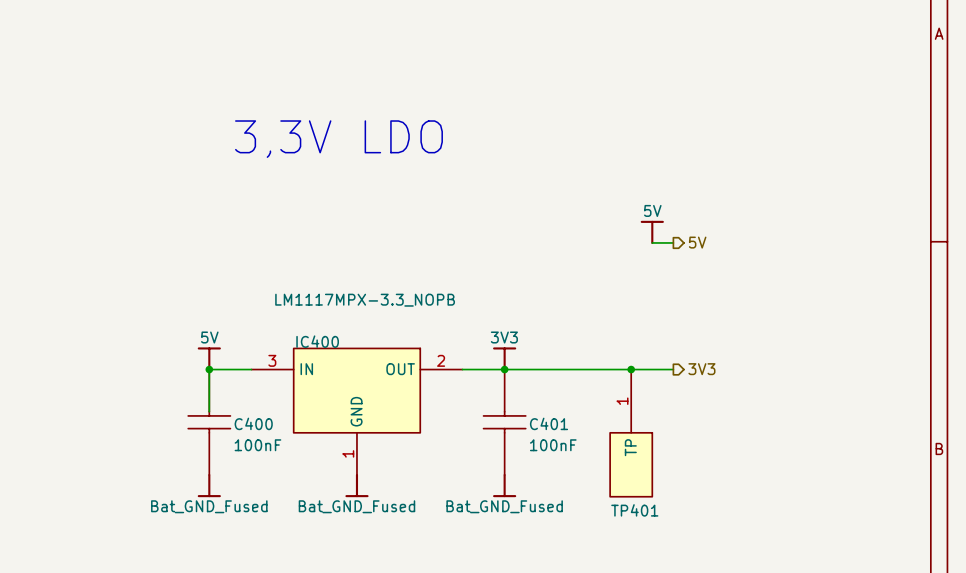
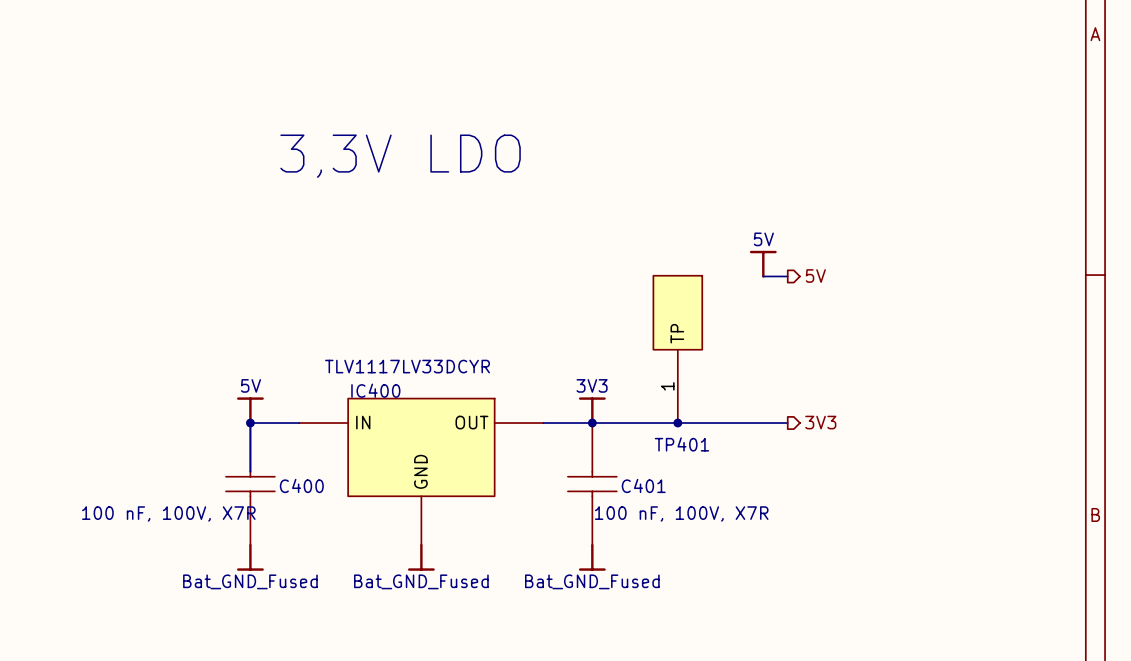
IC400 value: LM1117MPX-3.3_NOPB (365, 300) -> TLV1117LV33DCYR (407, 366)
IC400 pin number: 3 (272, 360) -> none
IC400 pin number: 2 (441, 360) -> none
junction: none -> (677, 423)
junction: (631, 369) -> none
TP401 position: (631, 433) -> (677, 349)
C400 text: 100nF (257, 445) -> none
C401 text: 100nF (553, 445) -> none
C400 value: none -> 100 nF, 100V, X7R (168, 513)
C401 value: none -> 100 nF, 100V, X7R (681, 513)
IC400 pin number: 1 (348, 453) -> none
TP401 rotation: 0° (631, 464) -> 180° (677, 312)

